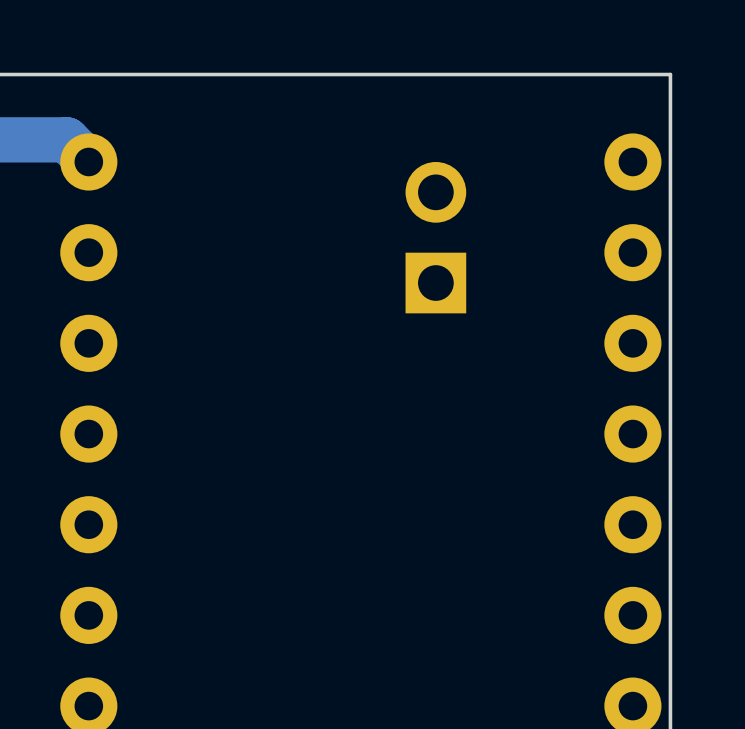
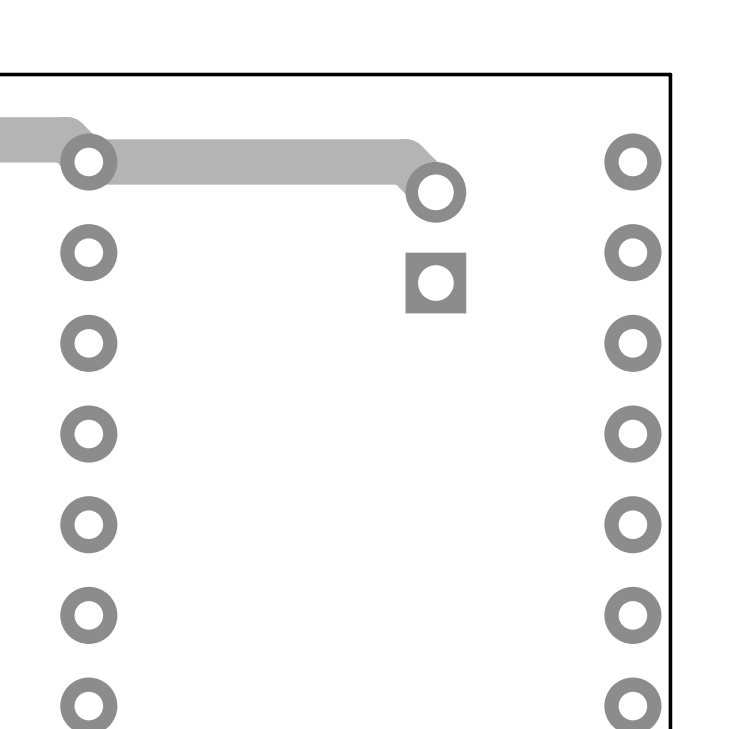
track: none -> (88, 161) (405, 161) (435, 192)

